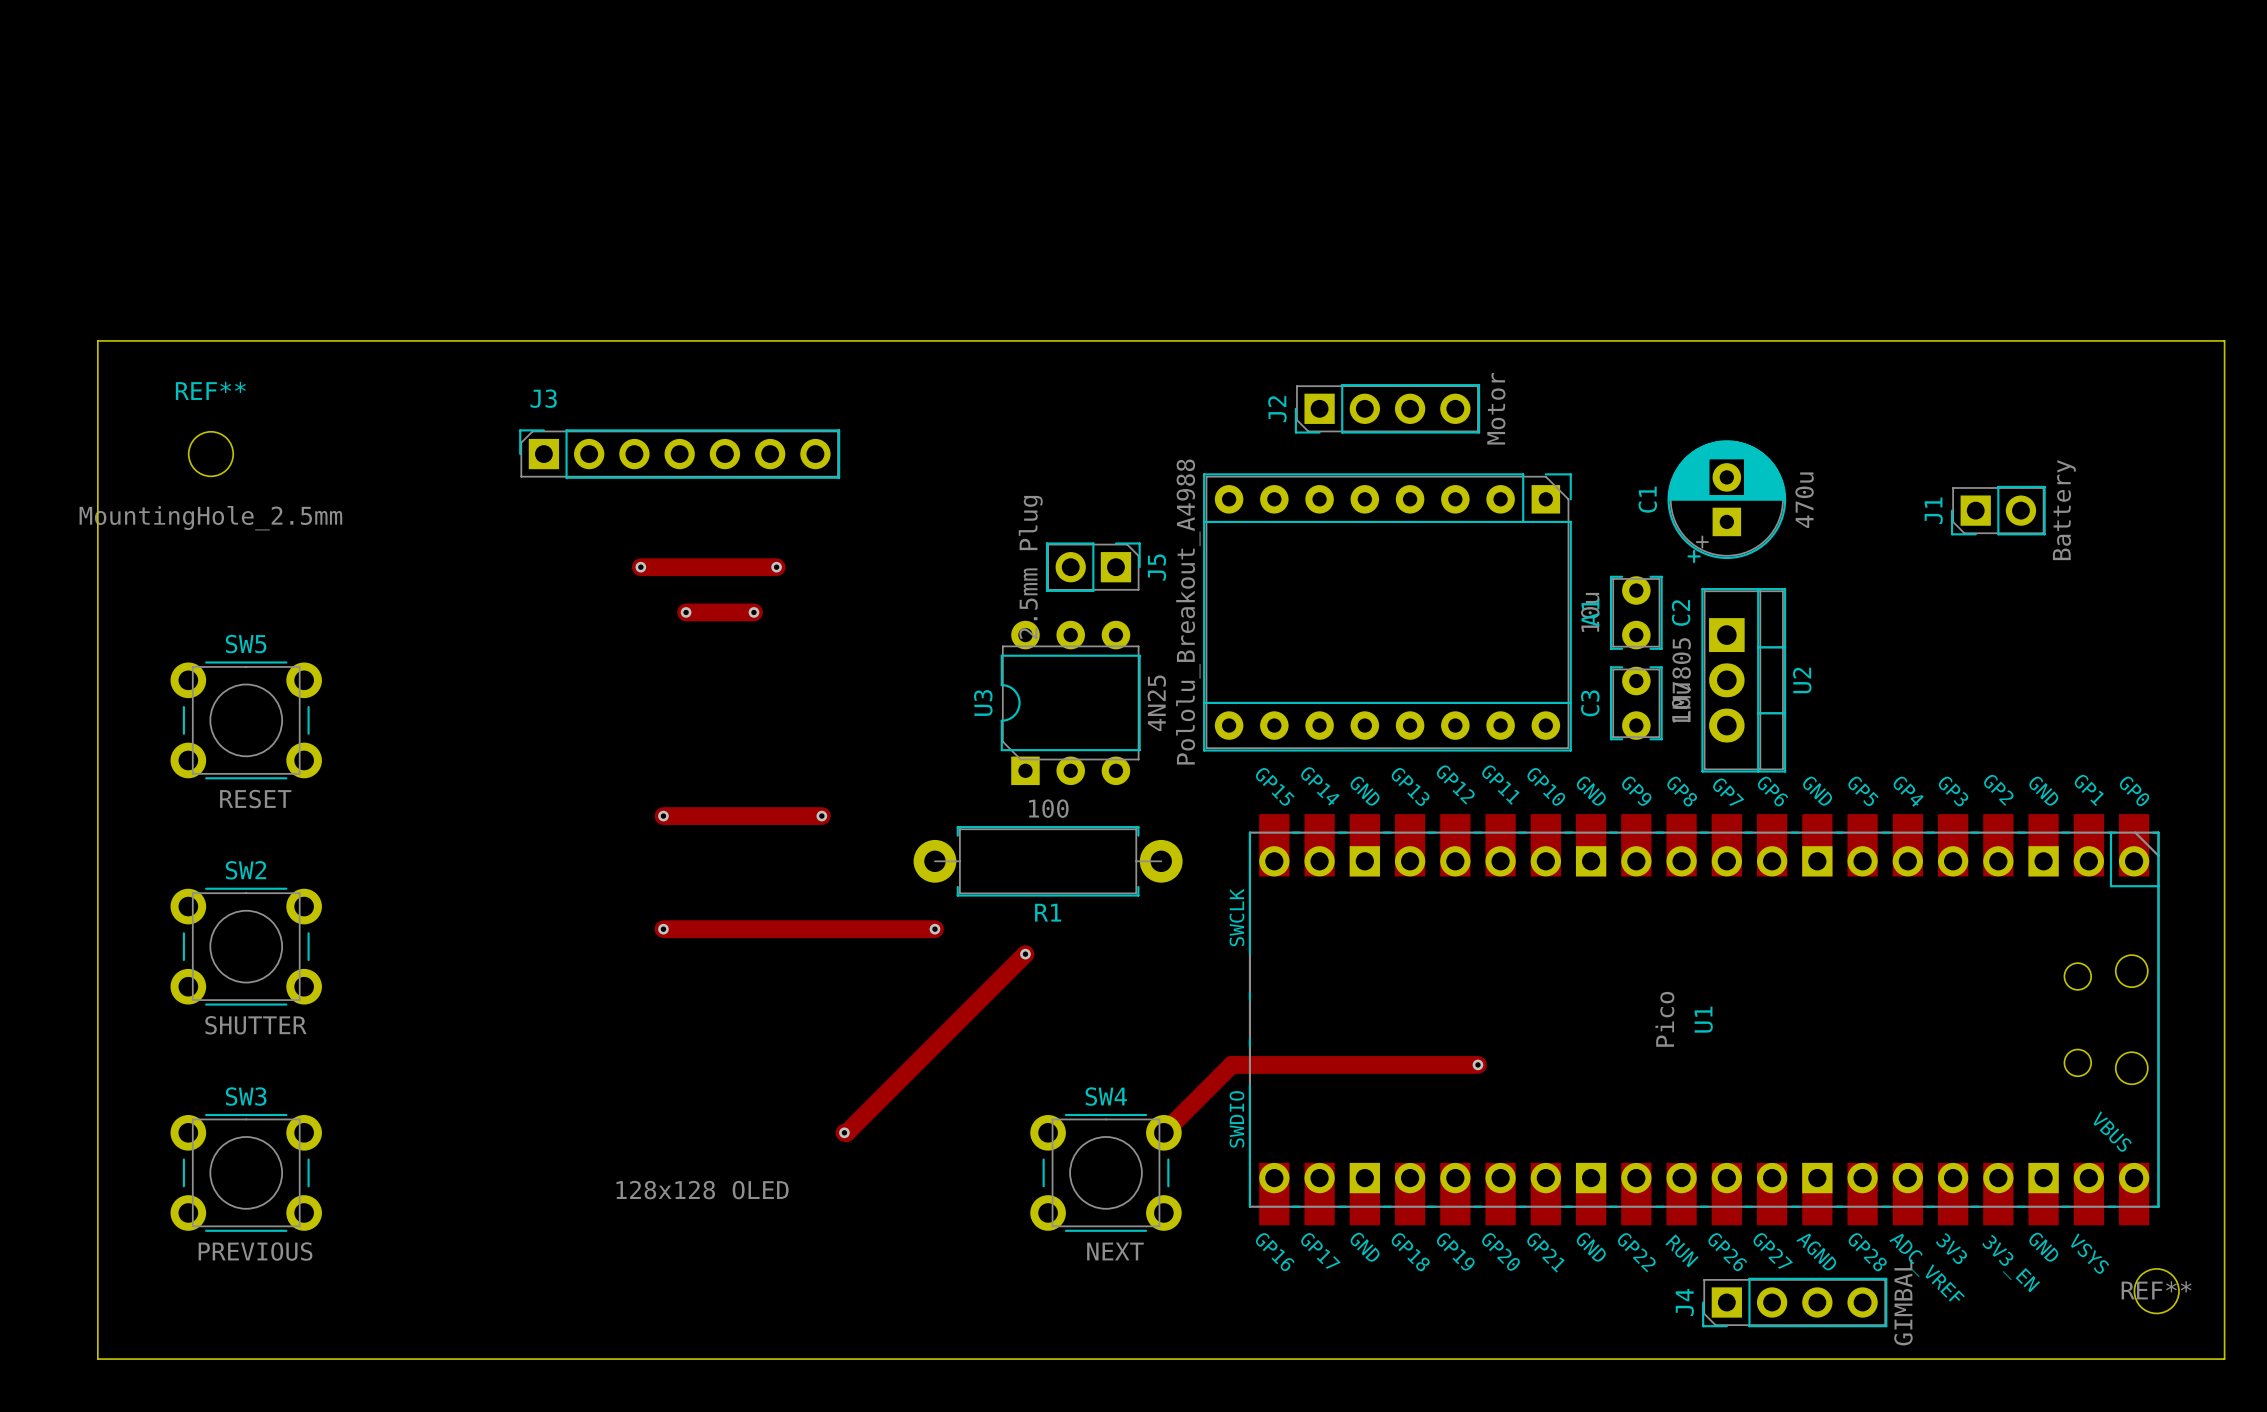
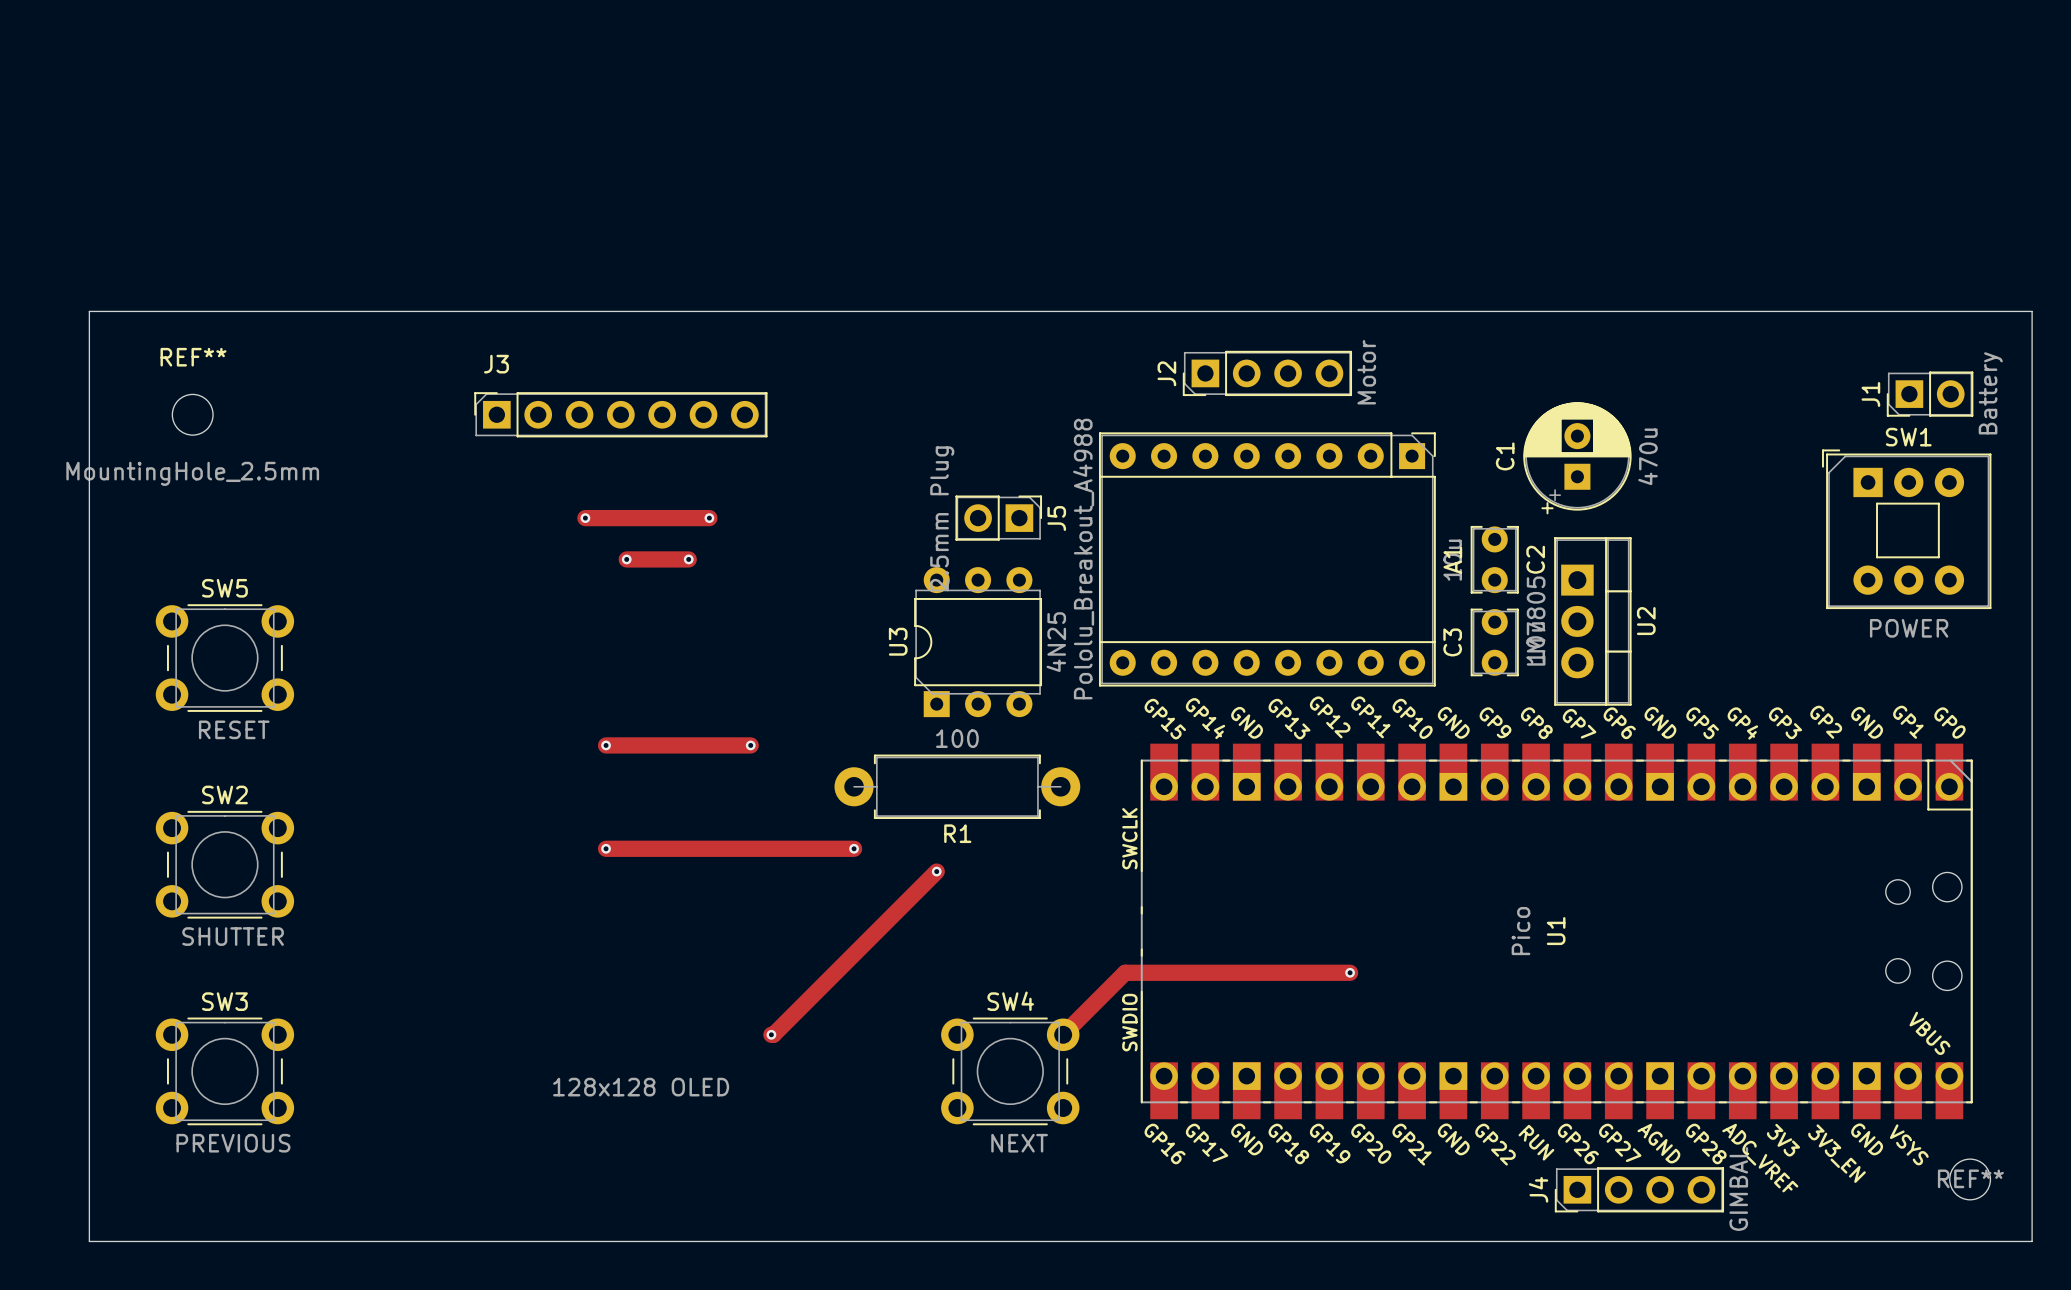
J1 position: (1998, 510) -> (1930, 394)
SW1: none -> POWER (1906, 529)

